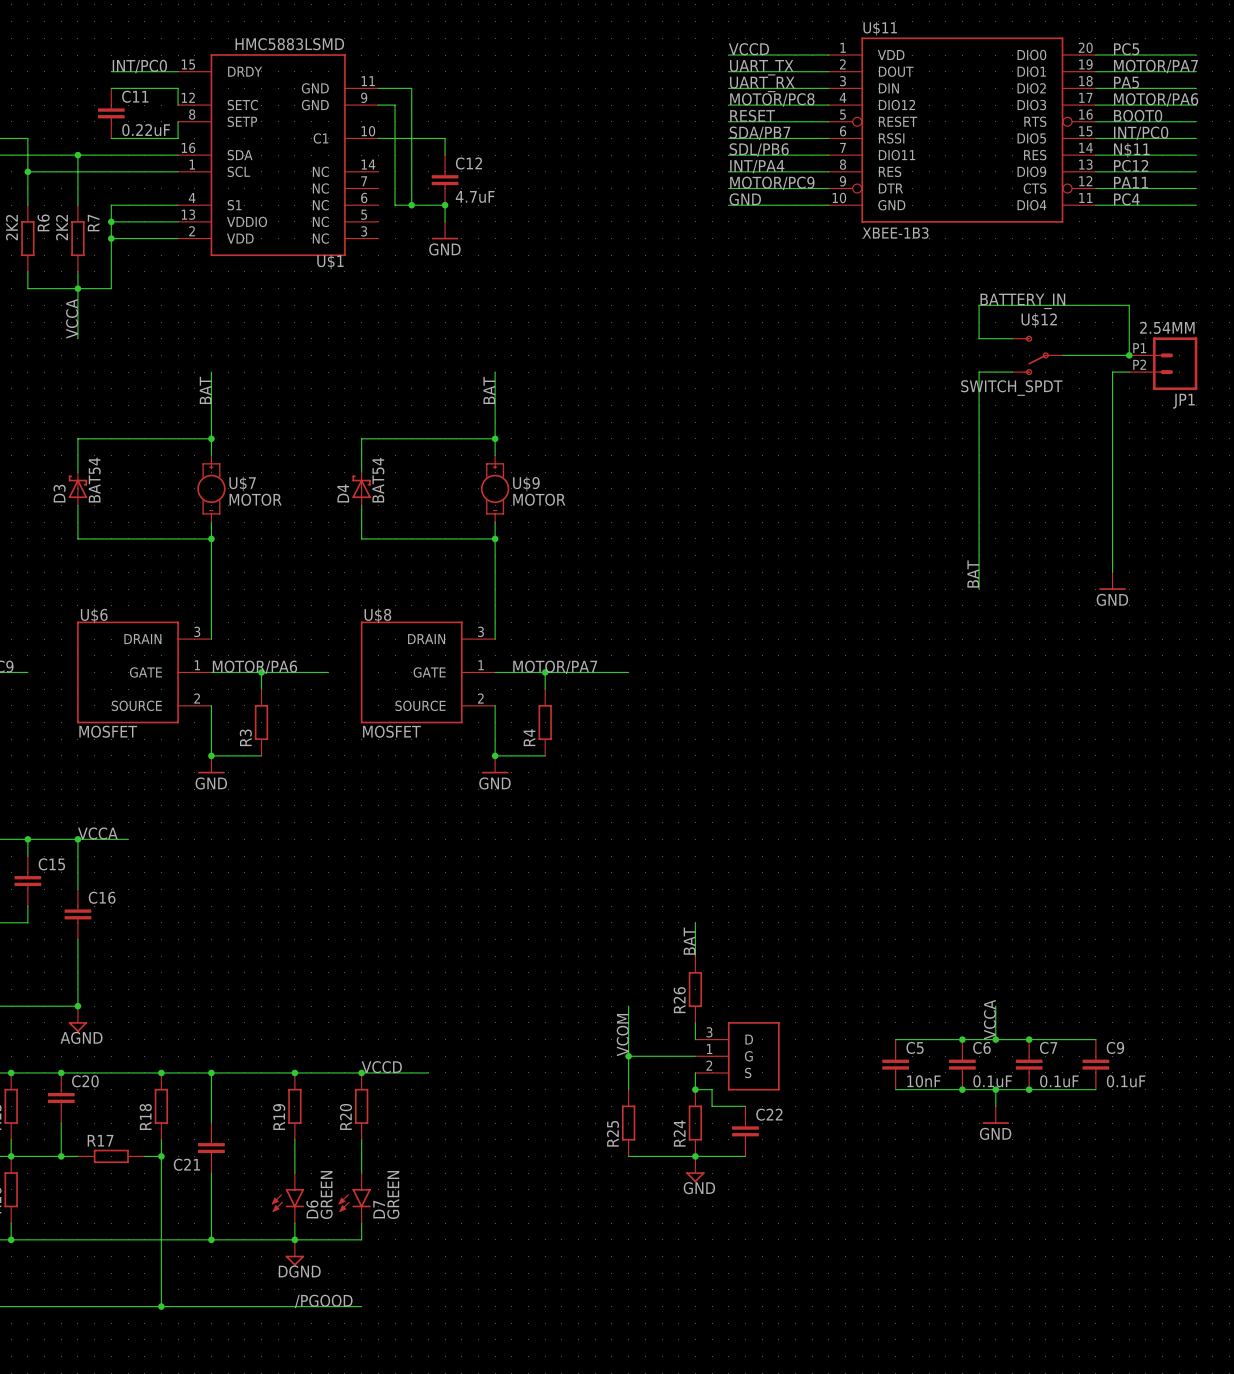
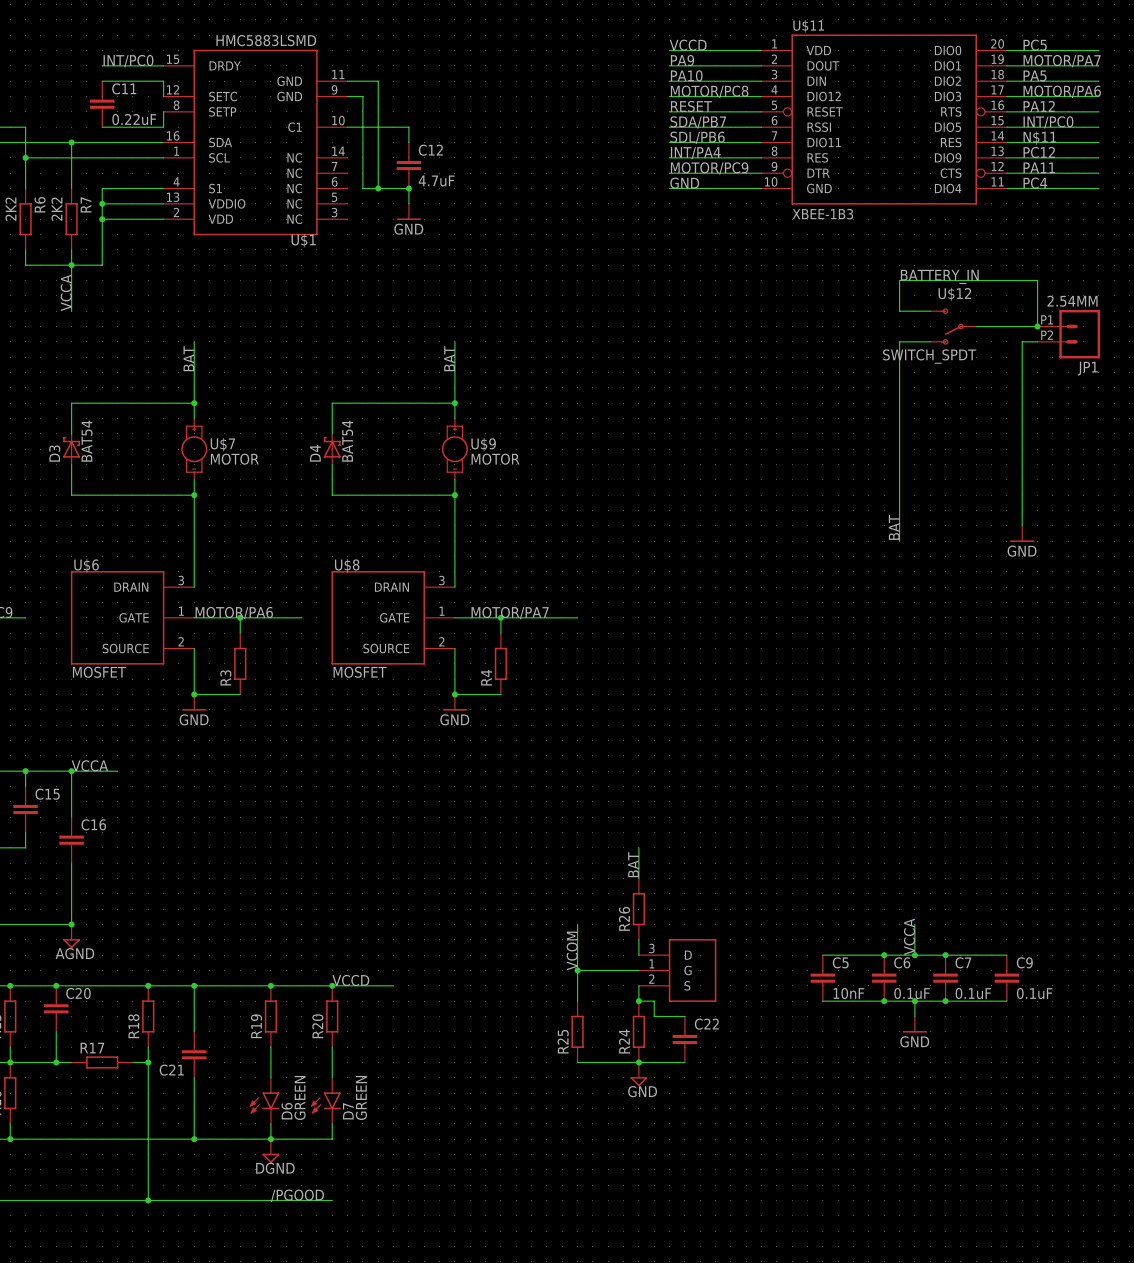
label: UART_TX (761, 67) -> PA9 (682, 60)
label: UART_RX (762, 84) -> PA10 (686, 75)
label: BOOT0 (1138, 115) -> PA12 (1039, 106)

